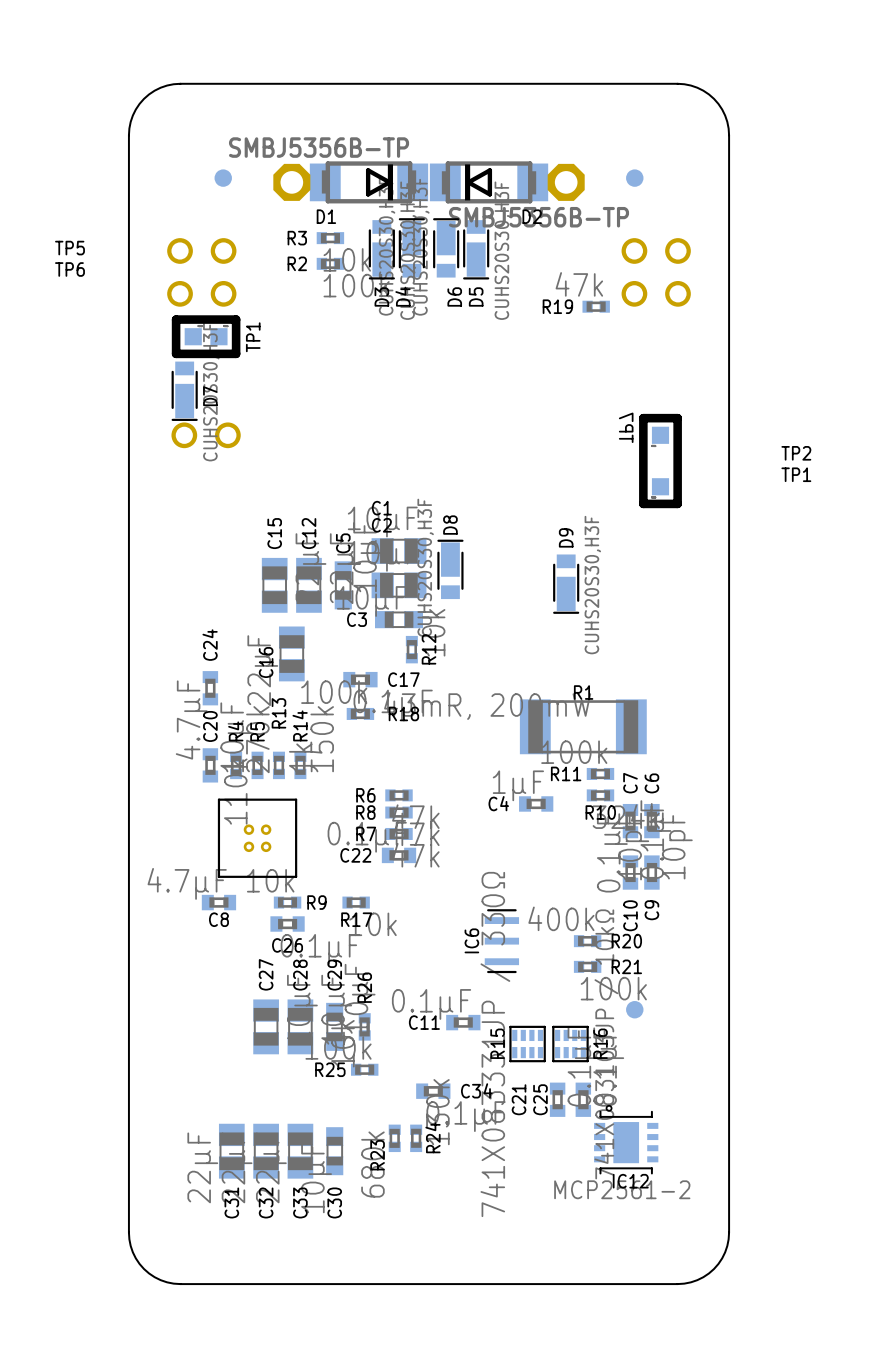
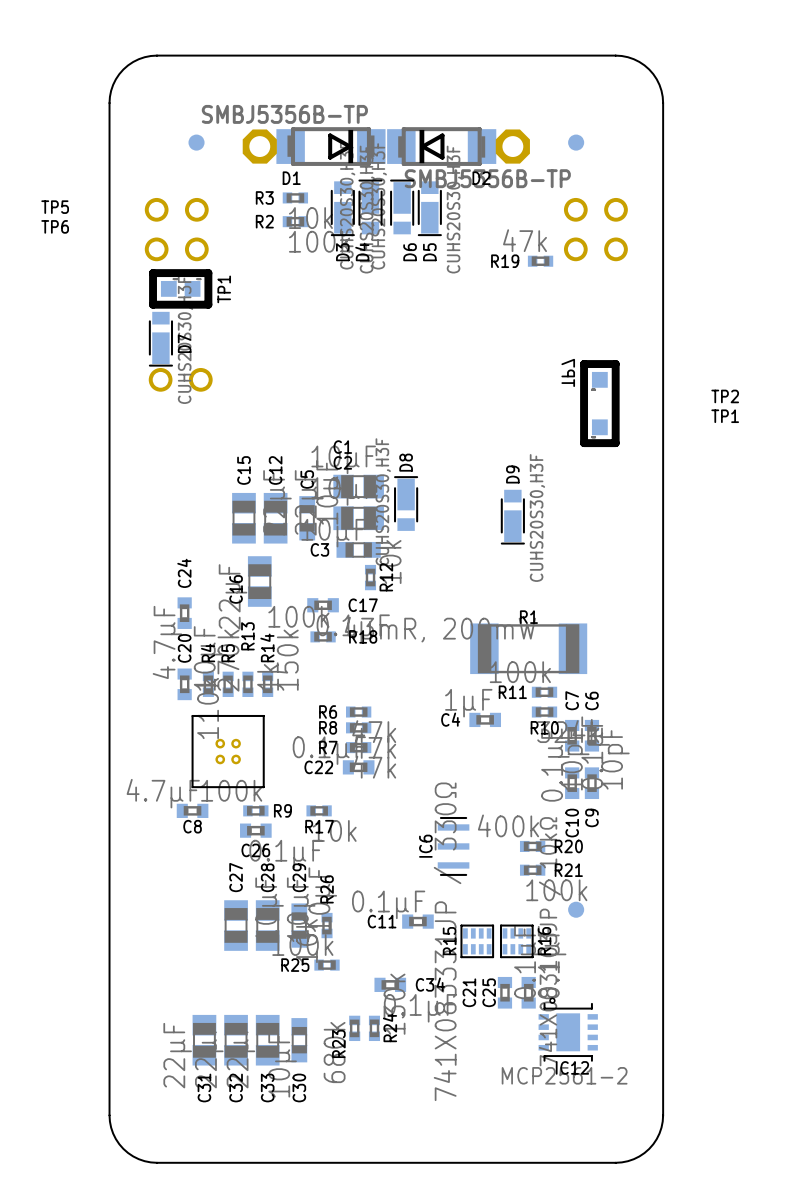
R9 value: 10k (270, 880) -> 100k (231, 790)

